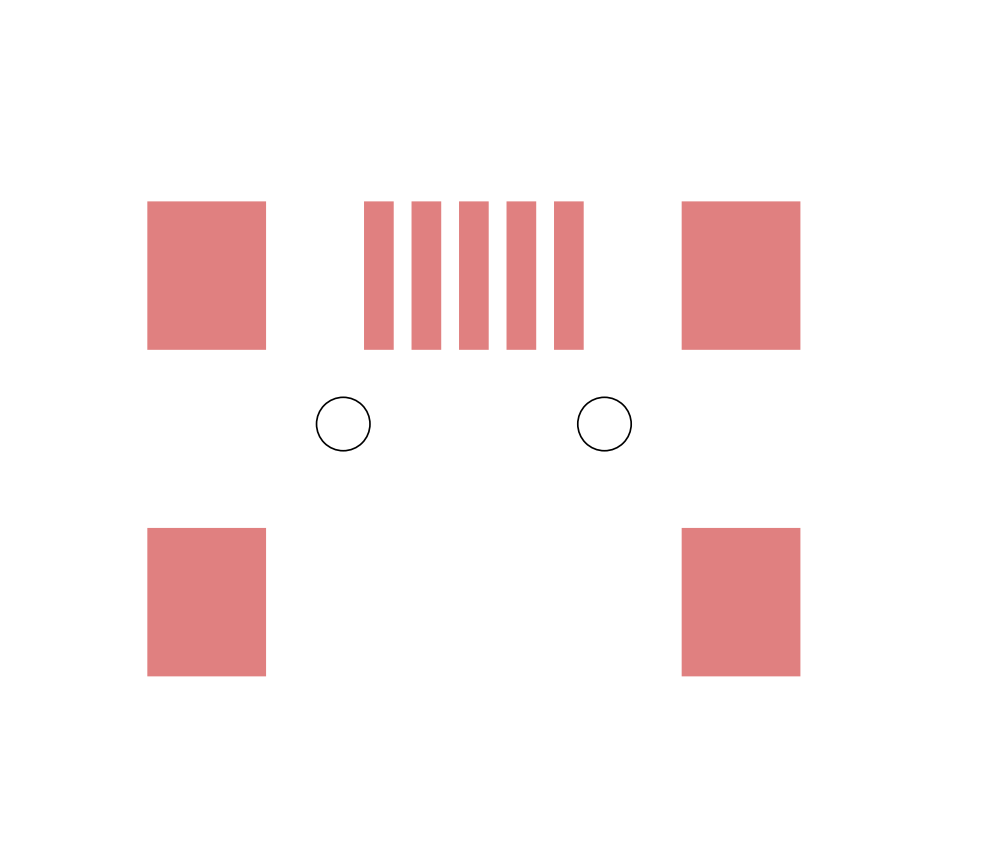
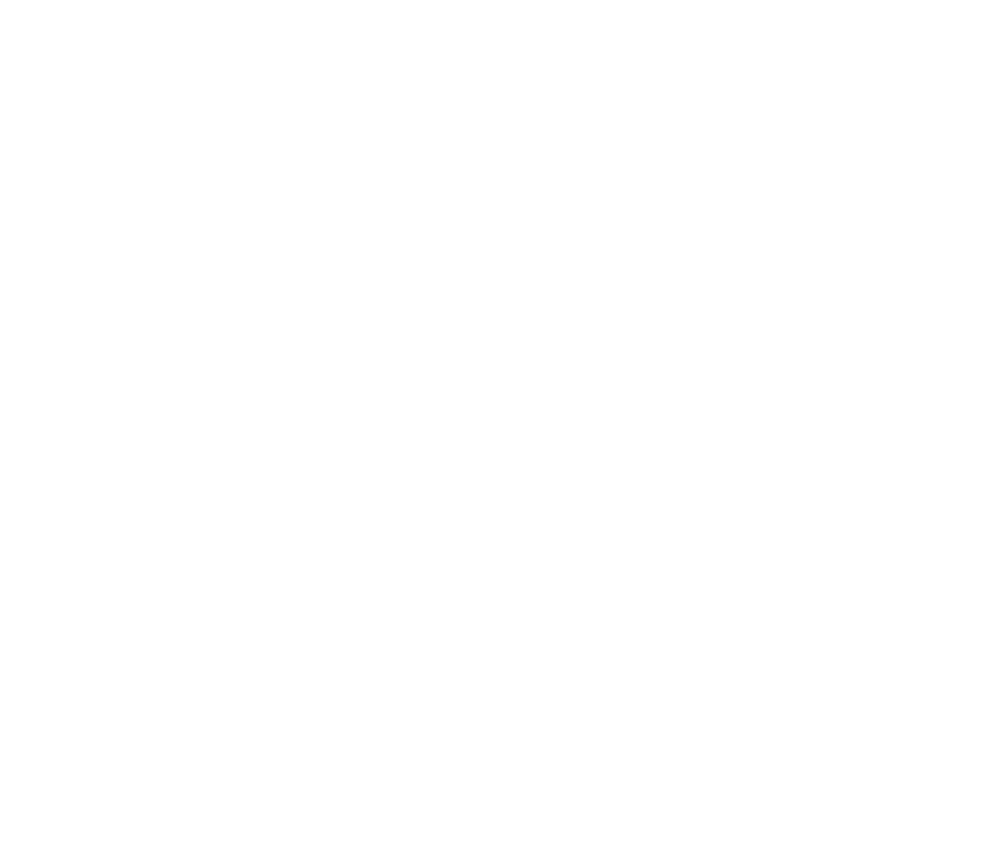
part: (473, 438) -> none

